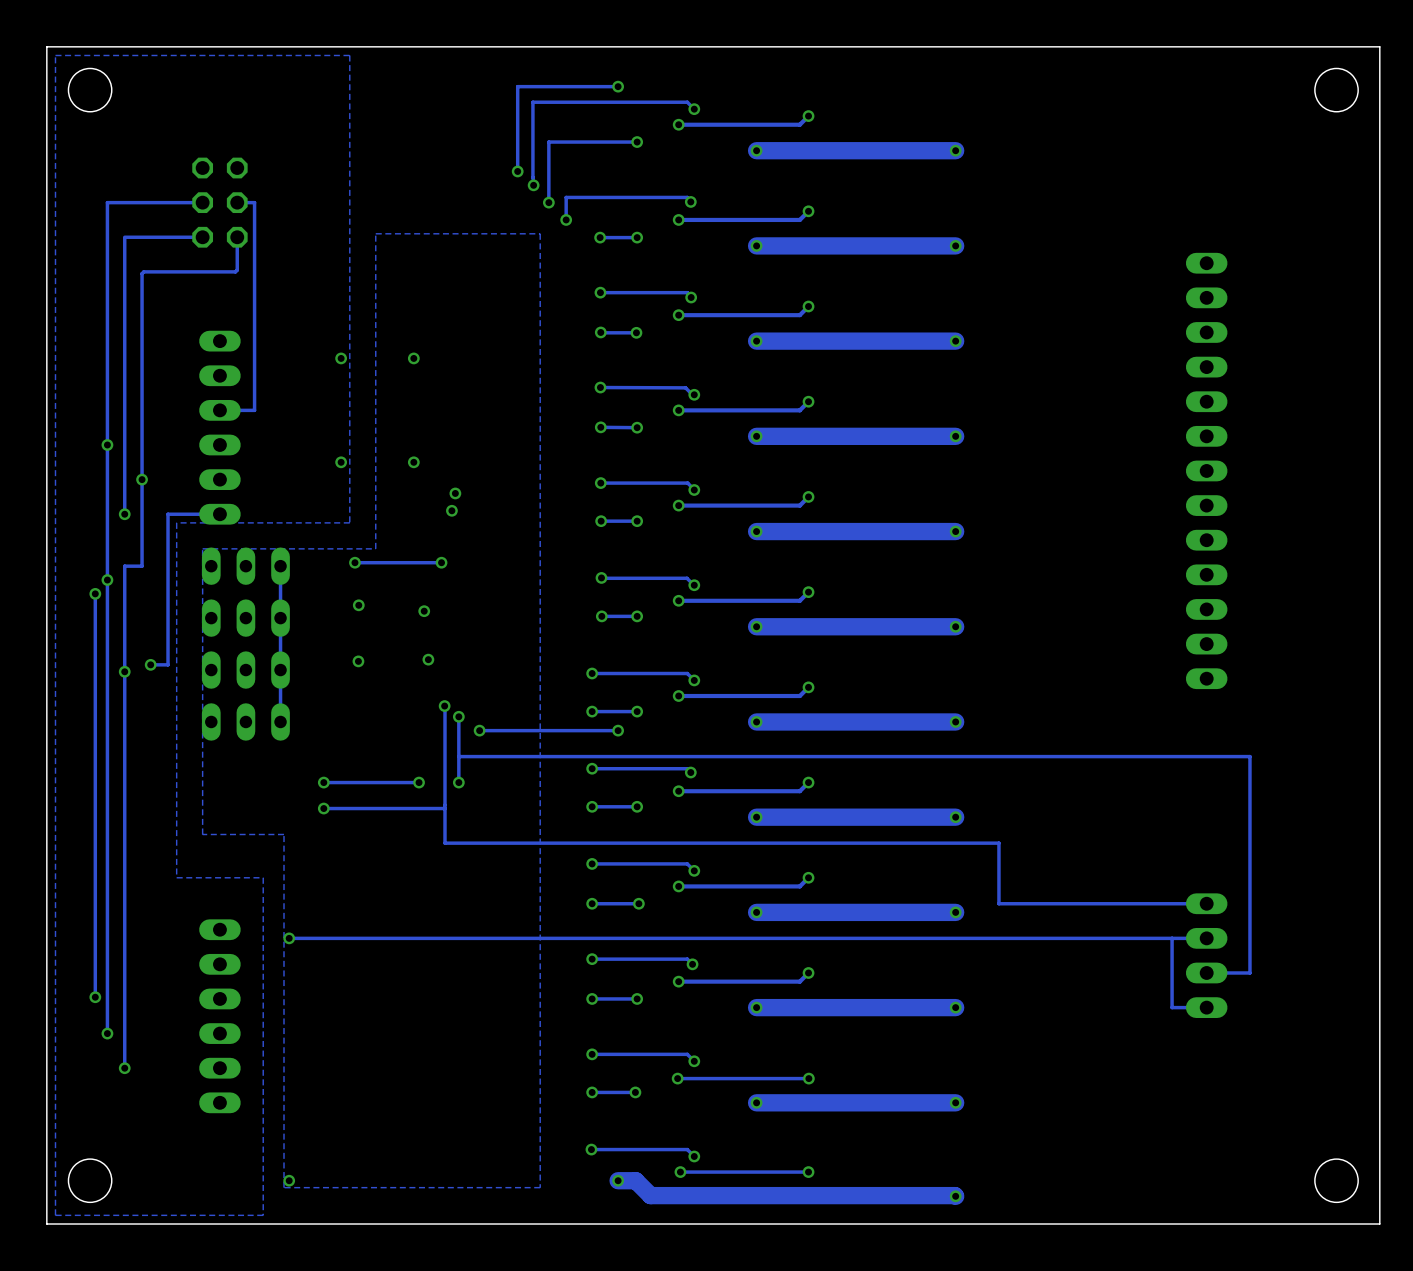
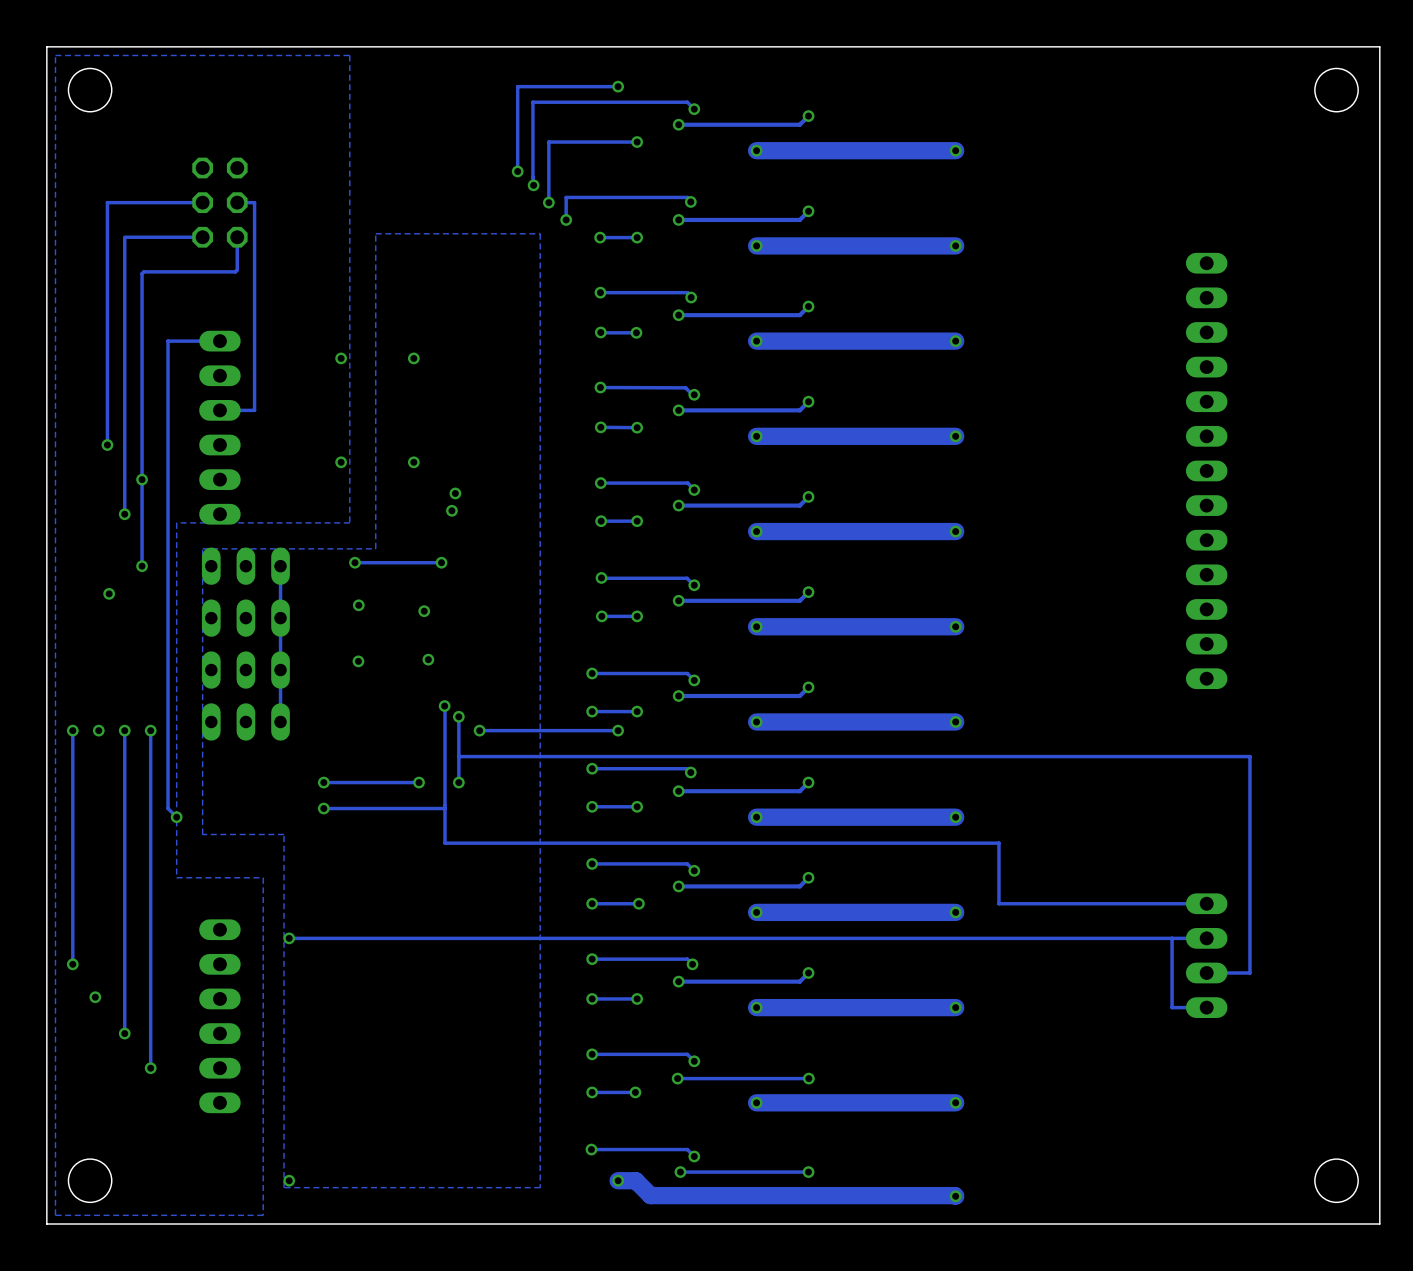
track: (107, 444) (107, 1033) -> none
track: (219, 514) (168, 514) -> (219, 341) (168, 341) (168, 514)
track: (142, 566) (124, 566) (124, 730) -> none
via: none -> (142, 566)
via: (107, 580) -> none
track: (95, 592) (95, 997) -> none
via: (95, 593) -> none
via: none -> (109, 593)
via: (150, 664) -> none
track: (168, 664) (150, 664) -> (168, 664) (168, 808) (176, 817)
via: (124, 671) -> none
track: none -> (72, 730) (72, 964)
via: none -> (72, 730)
via: none -> (98, 730)
via: none -> (124, 730)
track: none -> (150, 730) (150, 1068)
via: none -> (150, 730)
via: none -> (176, 817)
via: none -> (72, 964)
via: (107, 1033) -> none
track: (124, 1033) (124, 1068) -> none
via: none -> (124, 1033)
via: (124, 1068) -> none
via: none -> (150, 1068)

